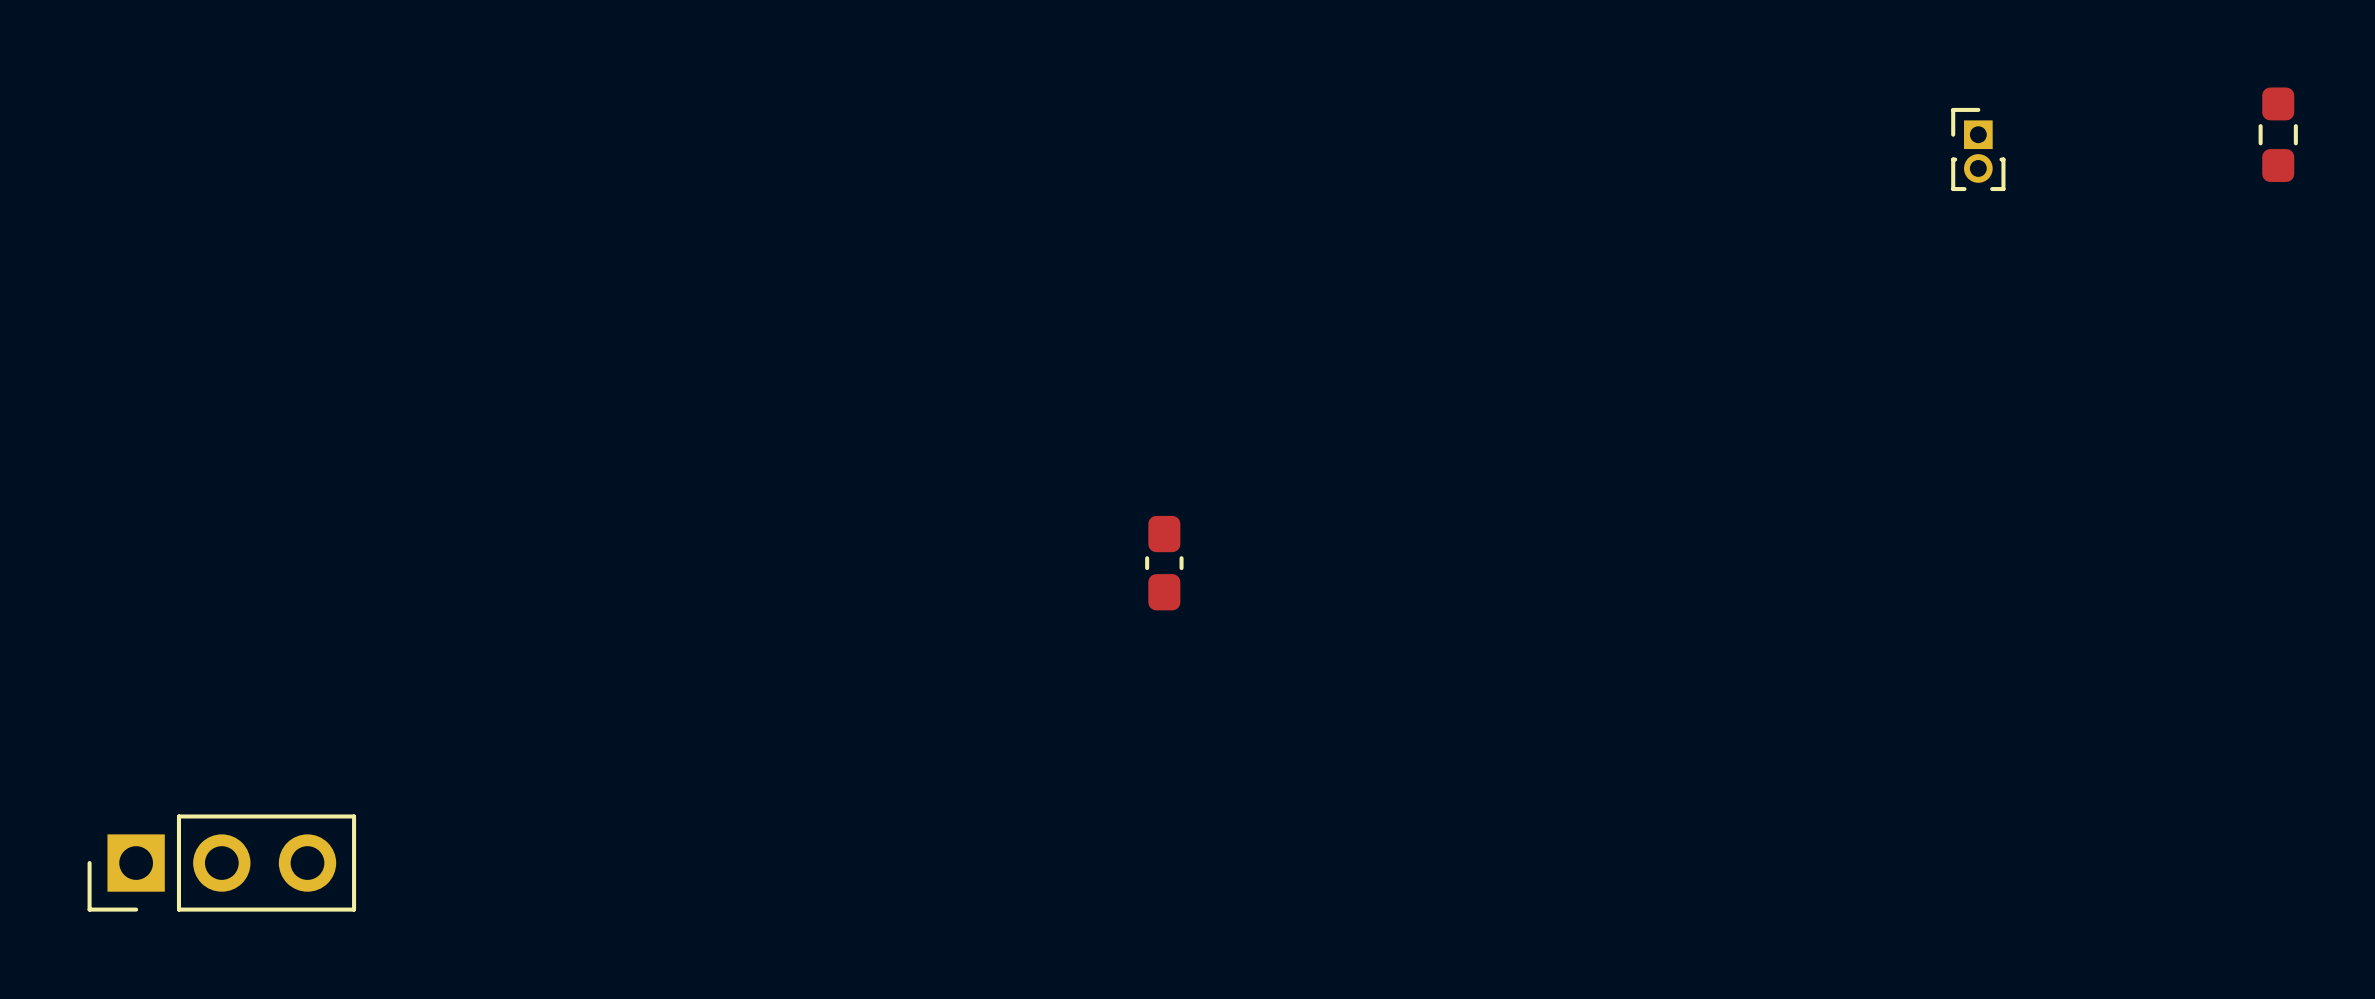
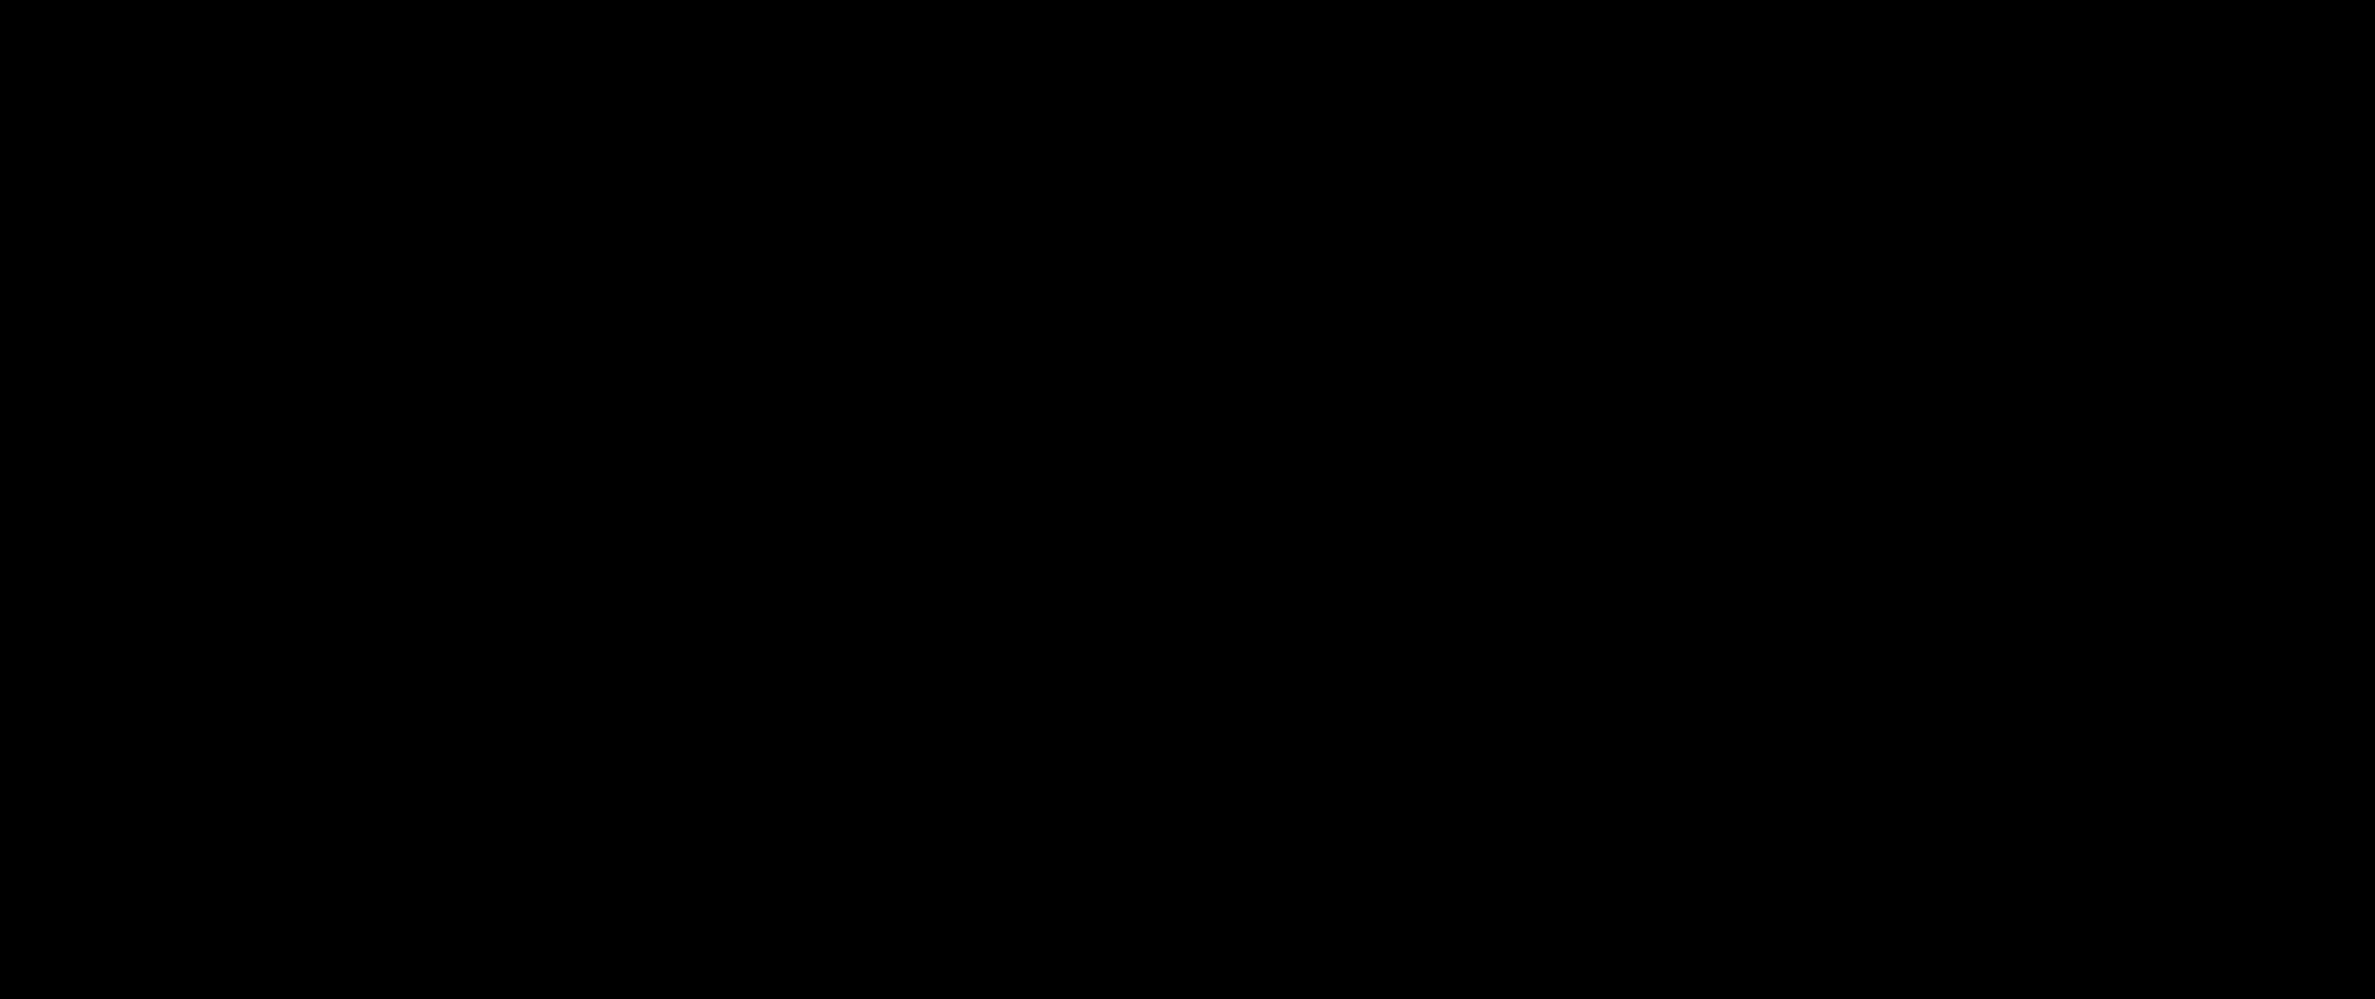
part: (2278, 134) -> none
part: (1978, 149) -> none
part: (1164, 563) -> none
part: (221, 863) -> none

